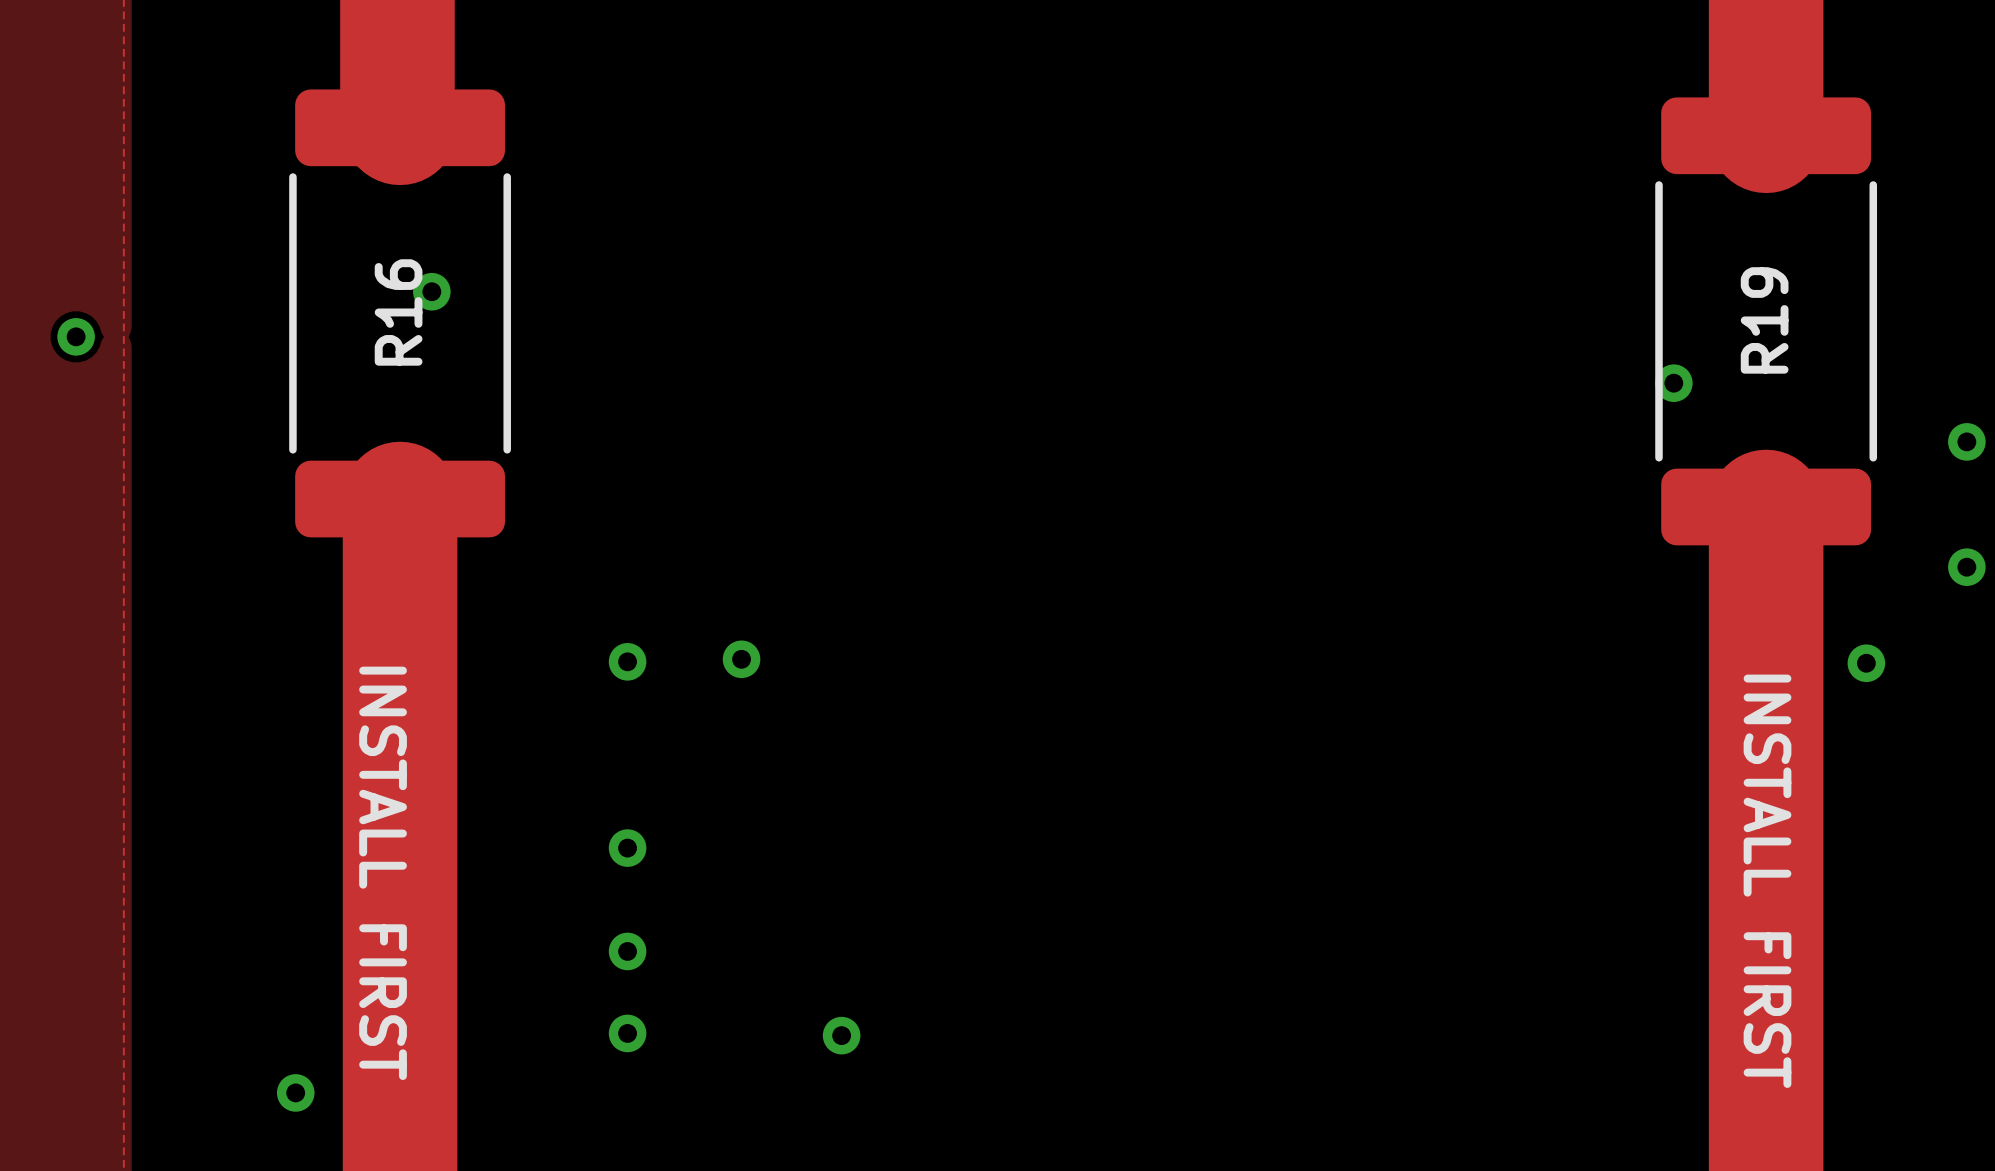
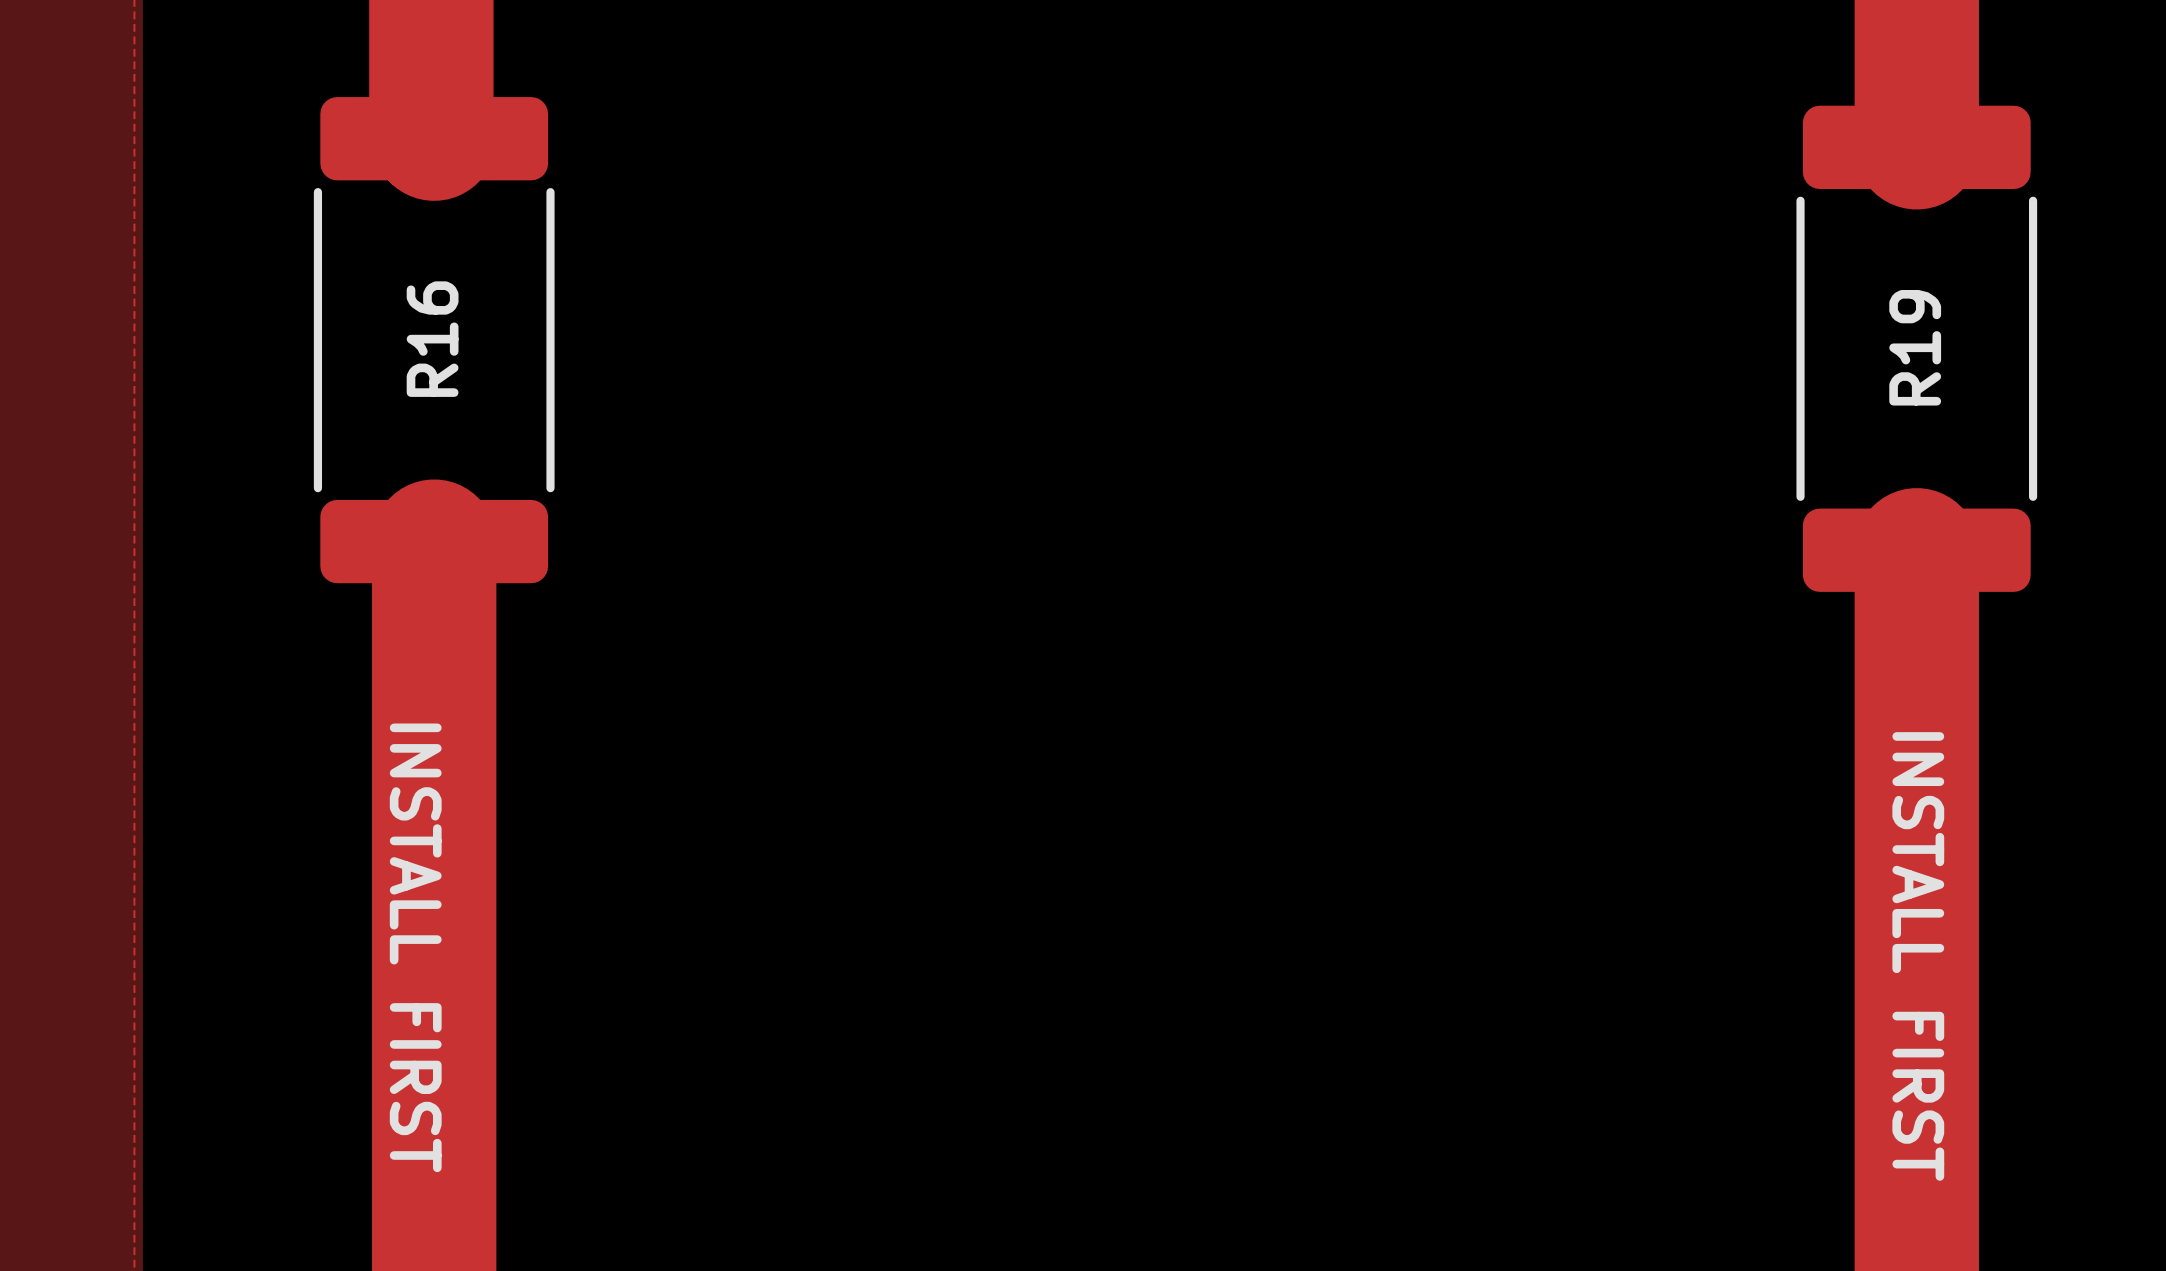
via: (431, 291) -> none
via: (76, 336) -> none
via: (1673, 383) -> none
via: (1966, 441) -> none
via: (1966, 567) -> none
via: (741, 659) -> none
via: (627, 661) -> none
via: (1866, 663) -> none
via: (627, 848) -> none
via: (627, 951) -> none
via: (627, 1033) -> none
via: (841, 1035) -> none
via: (295, 1092) -> none

